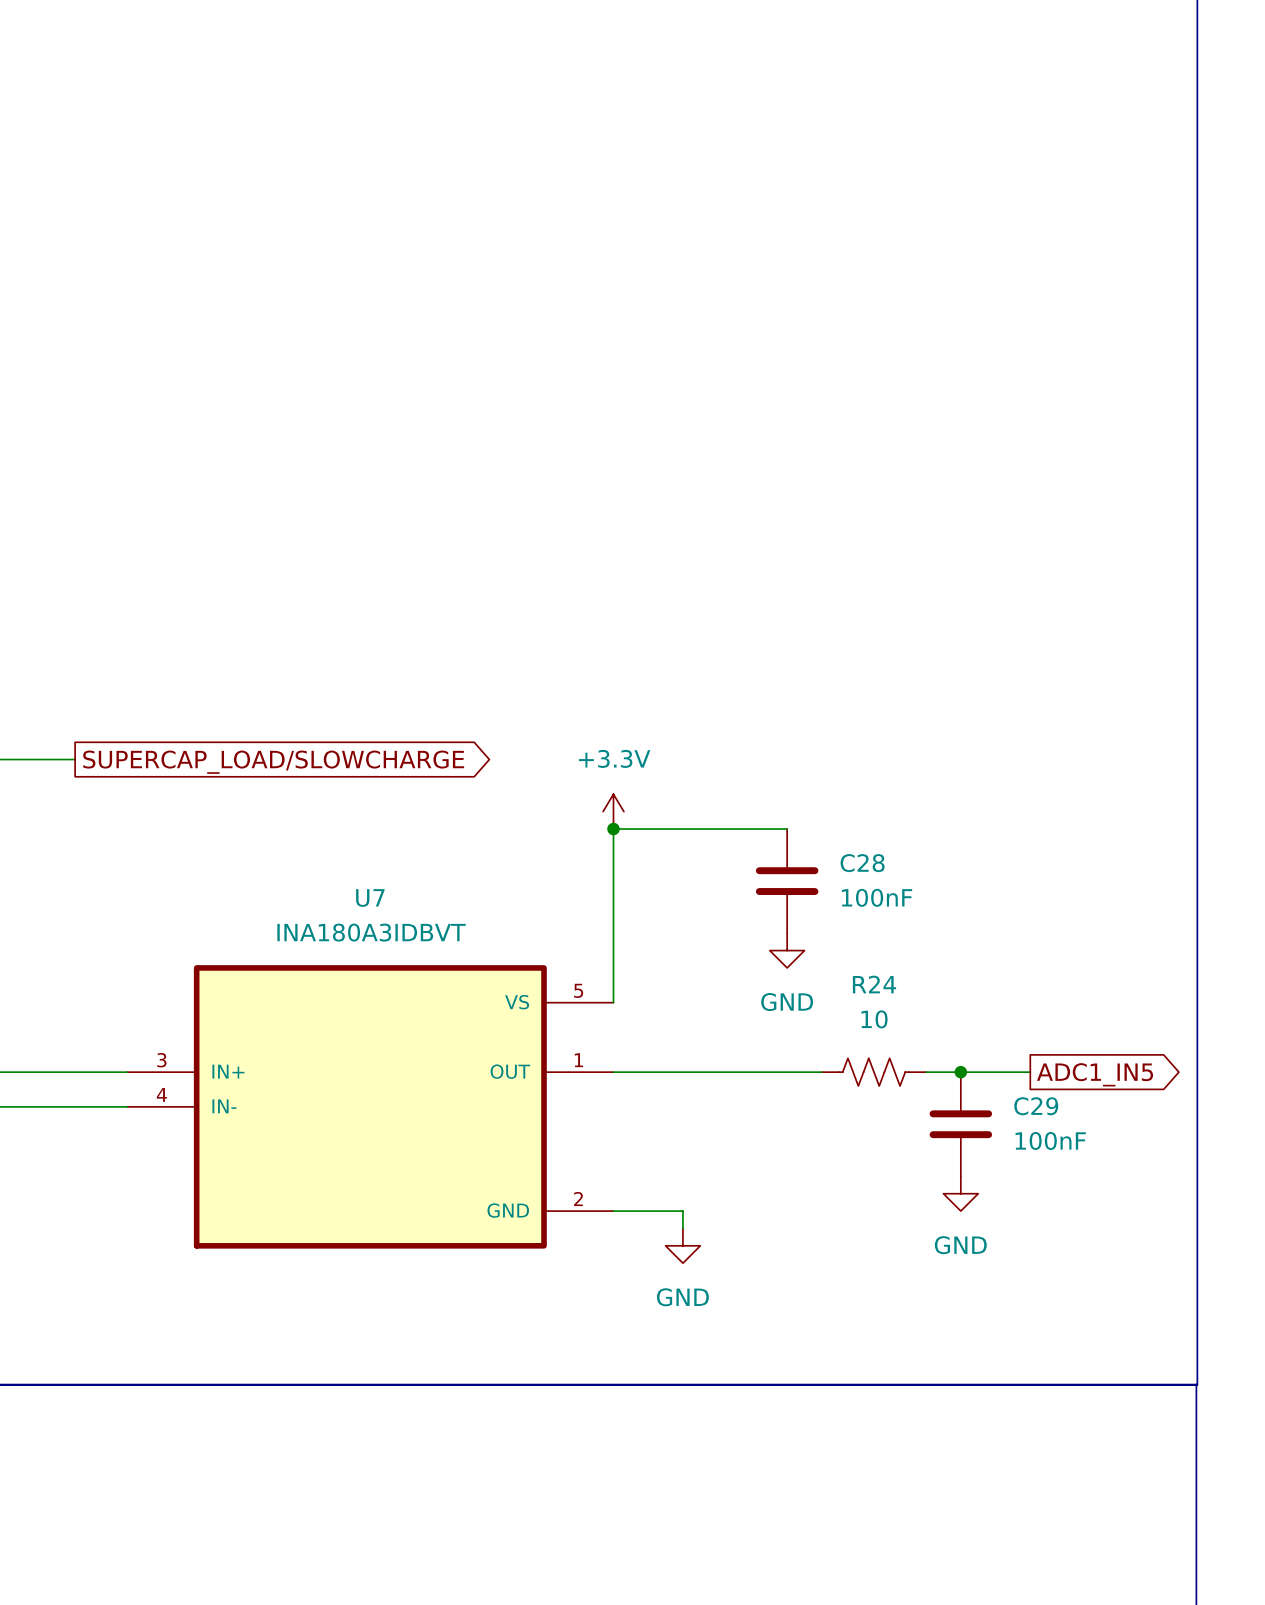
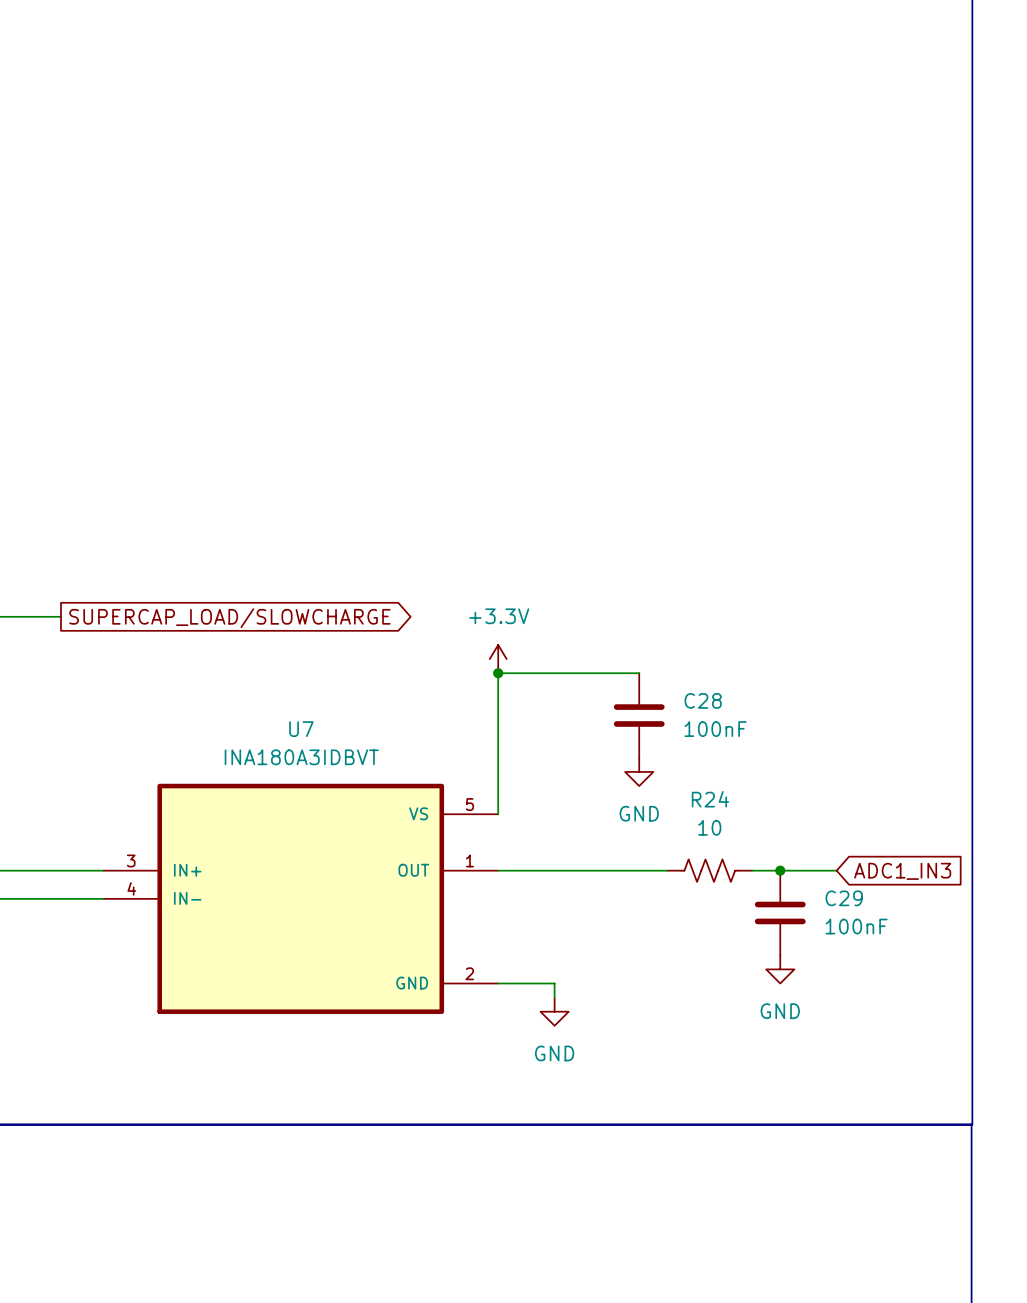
global label shape: output (1095, 1074) -> input (902, 871)
global label: ADC1_IN5 (1095, 1074) -> ADC1_IN3 (902, 871)

